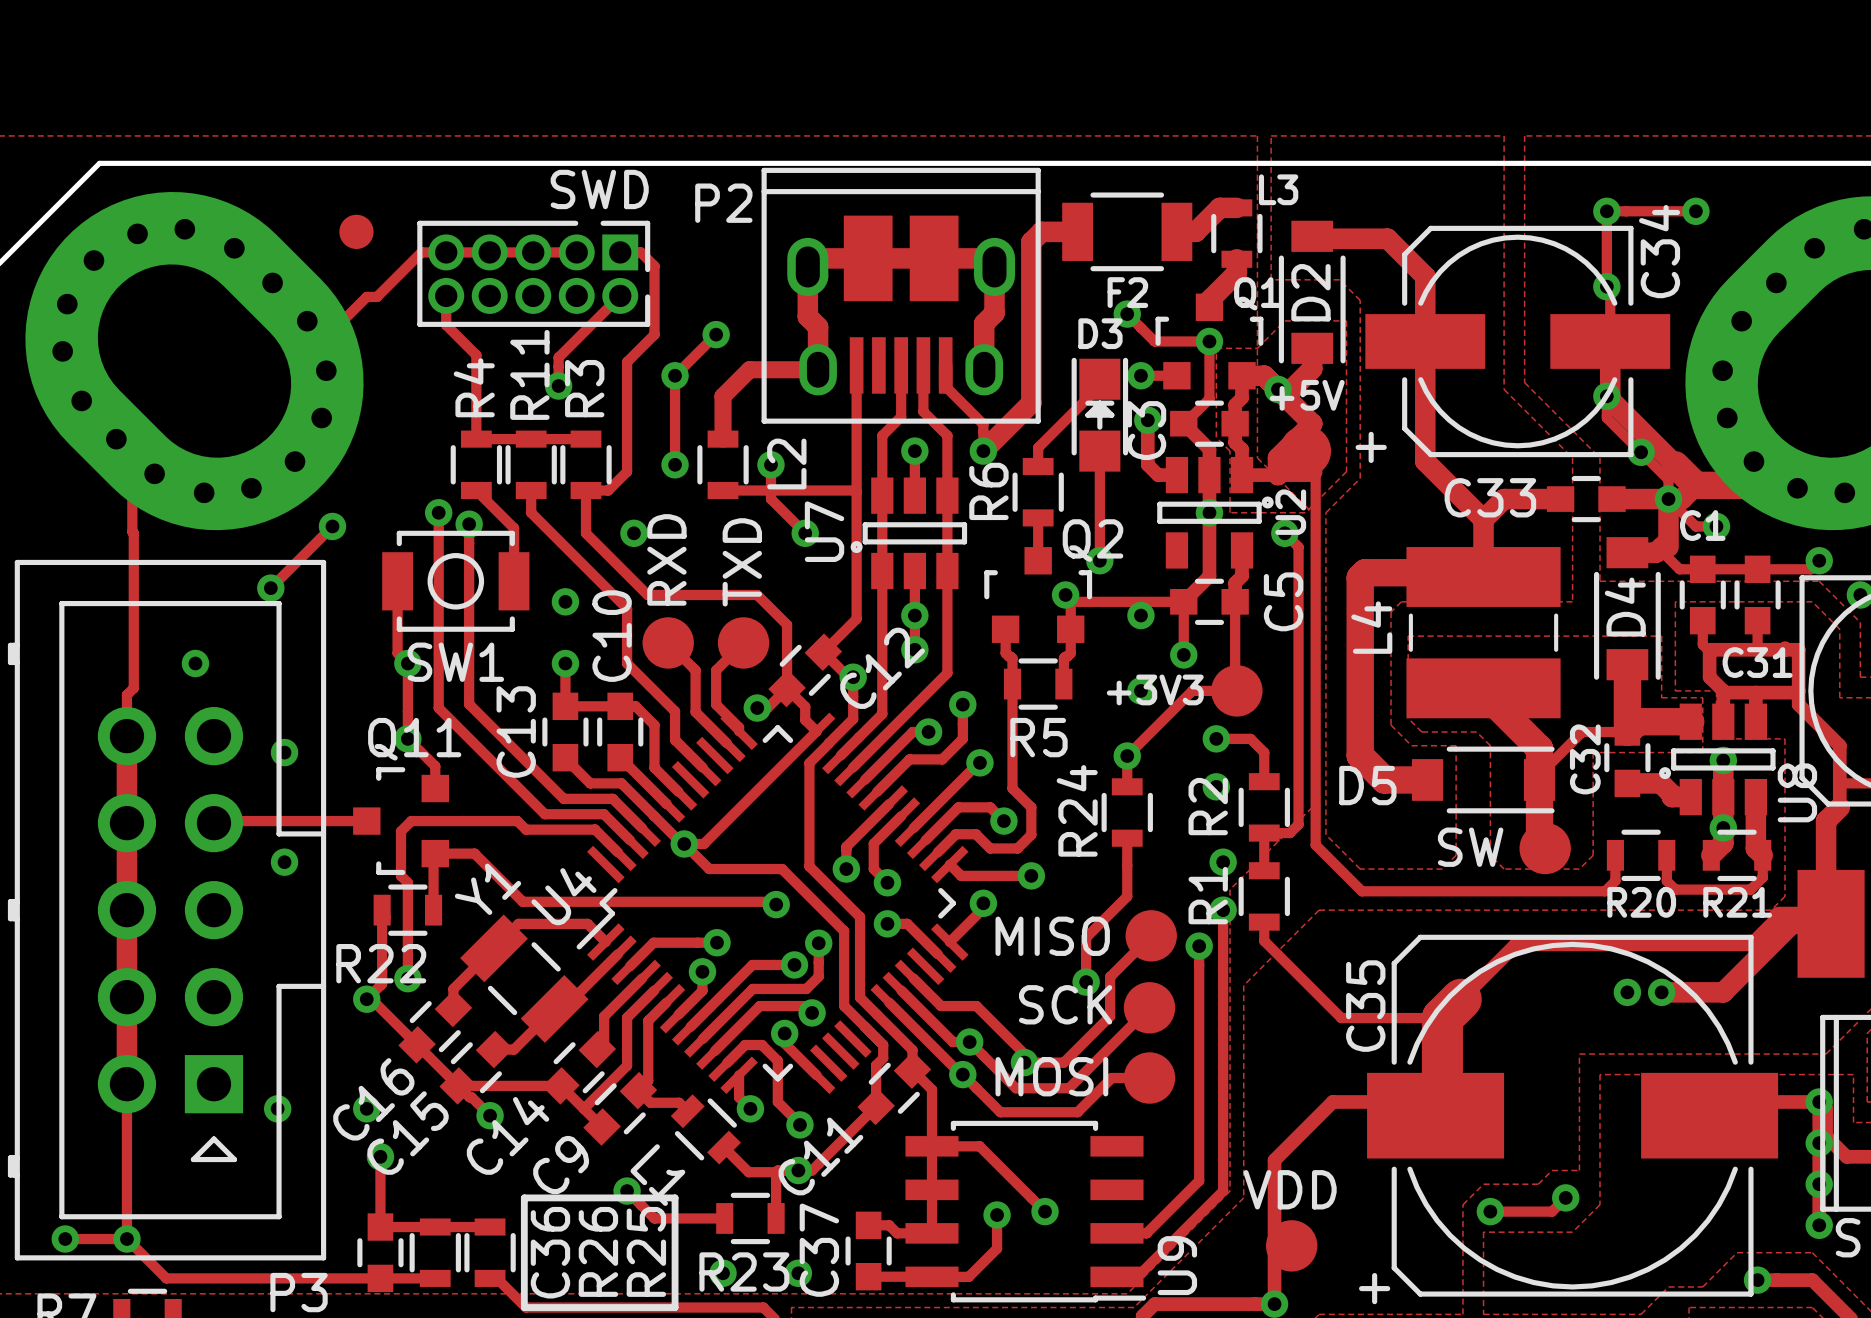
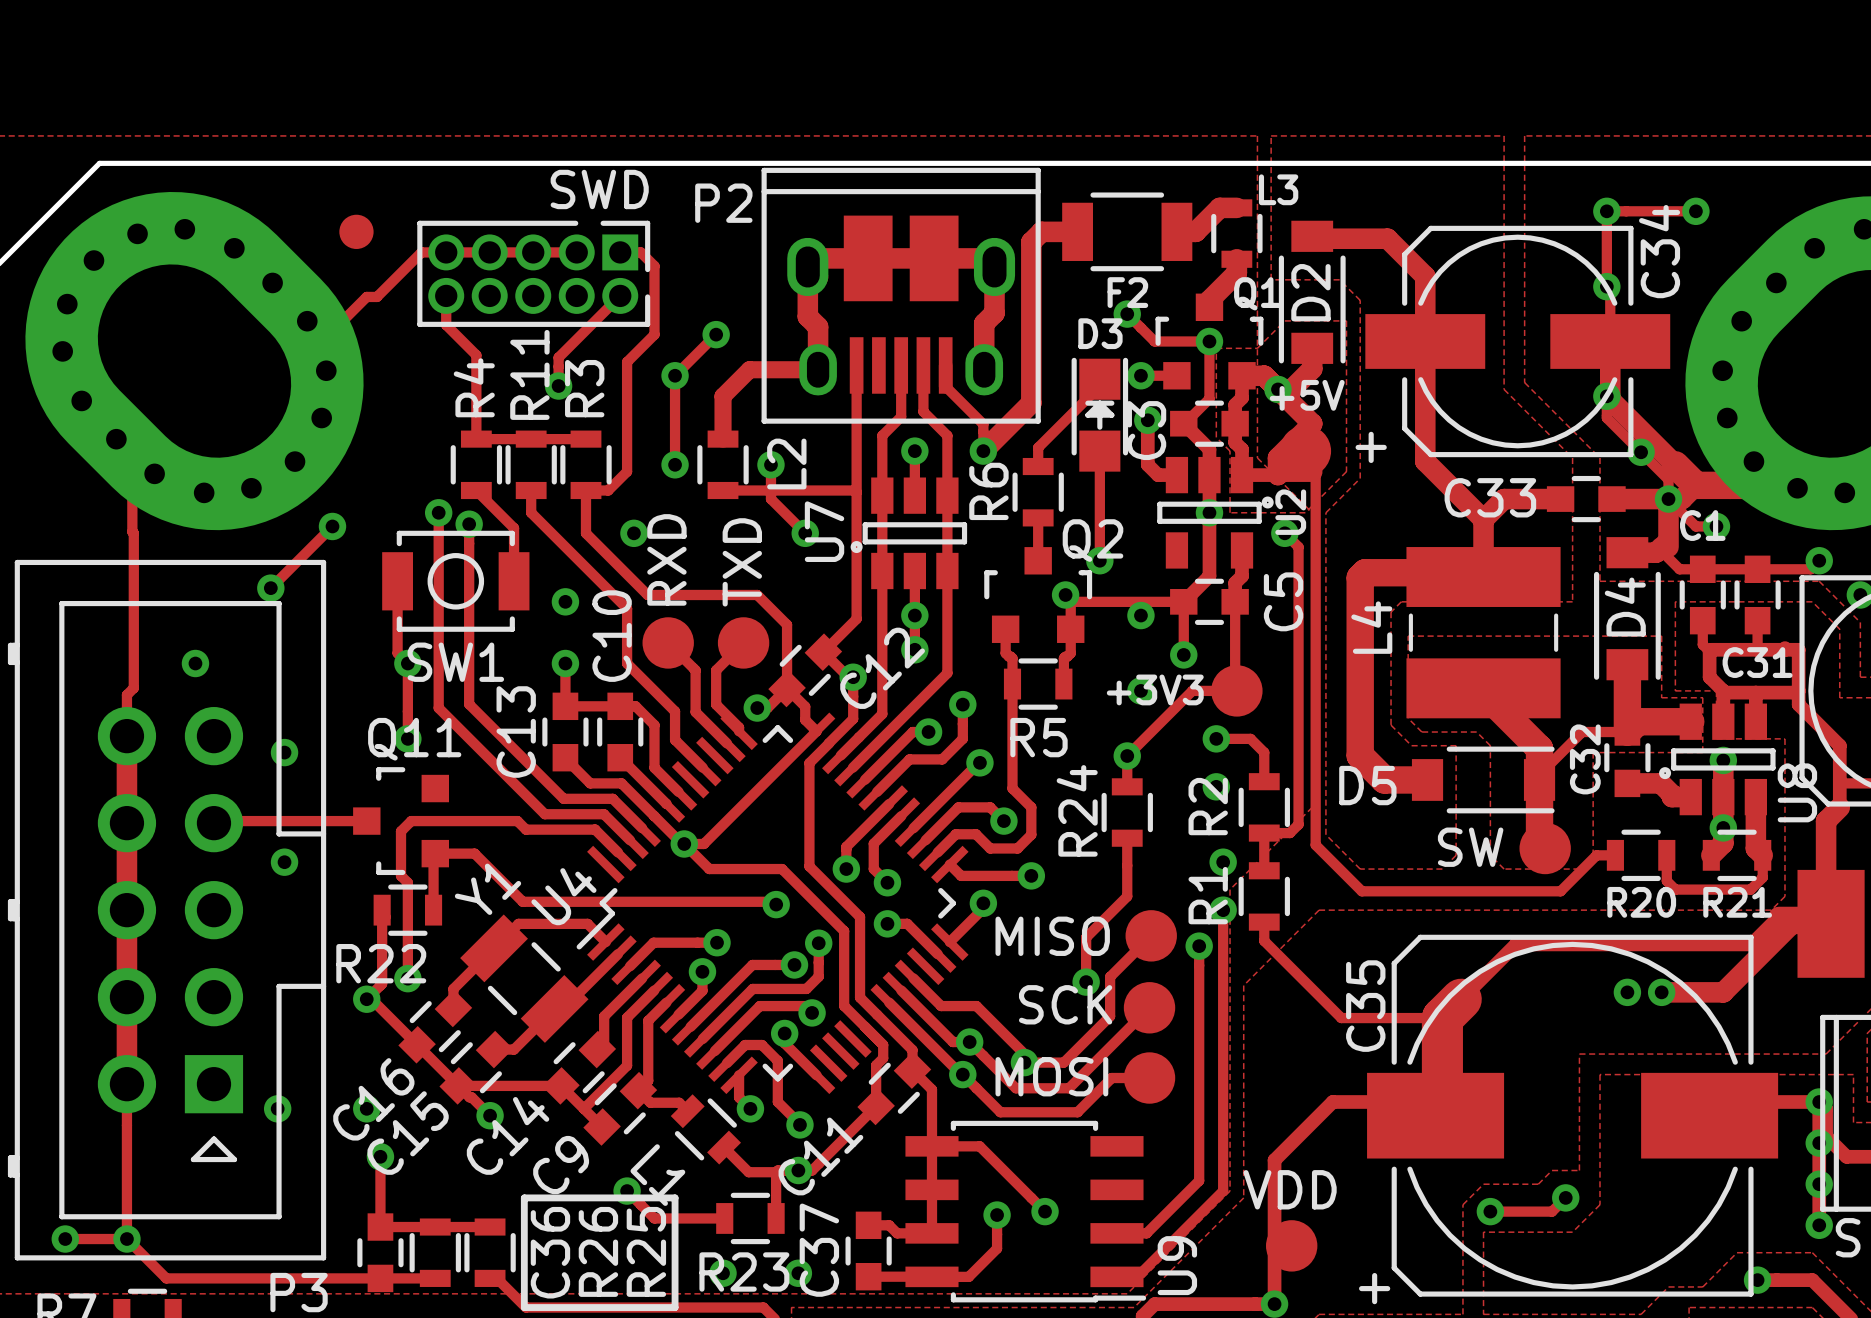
track: (407, 738) (435, 766) (435, 788) -> none
track: (1615, 855) (1615, 881) (1605, 891) (1560, 891) -> (1615, 855) (1596, 855) (1560, 891)

